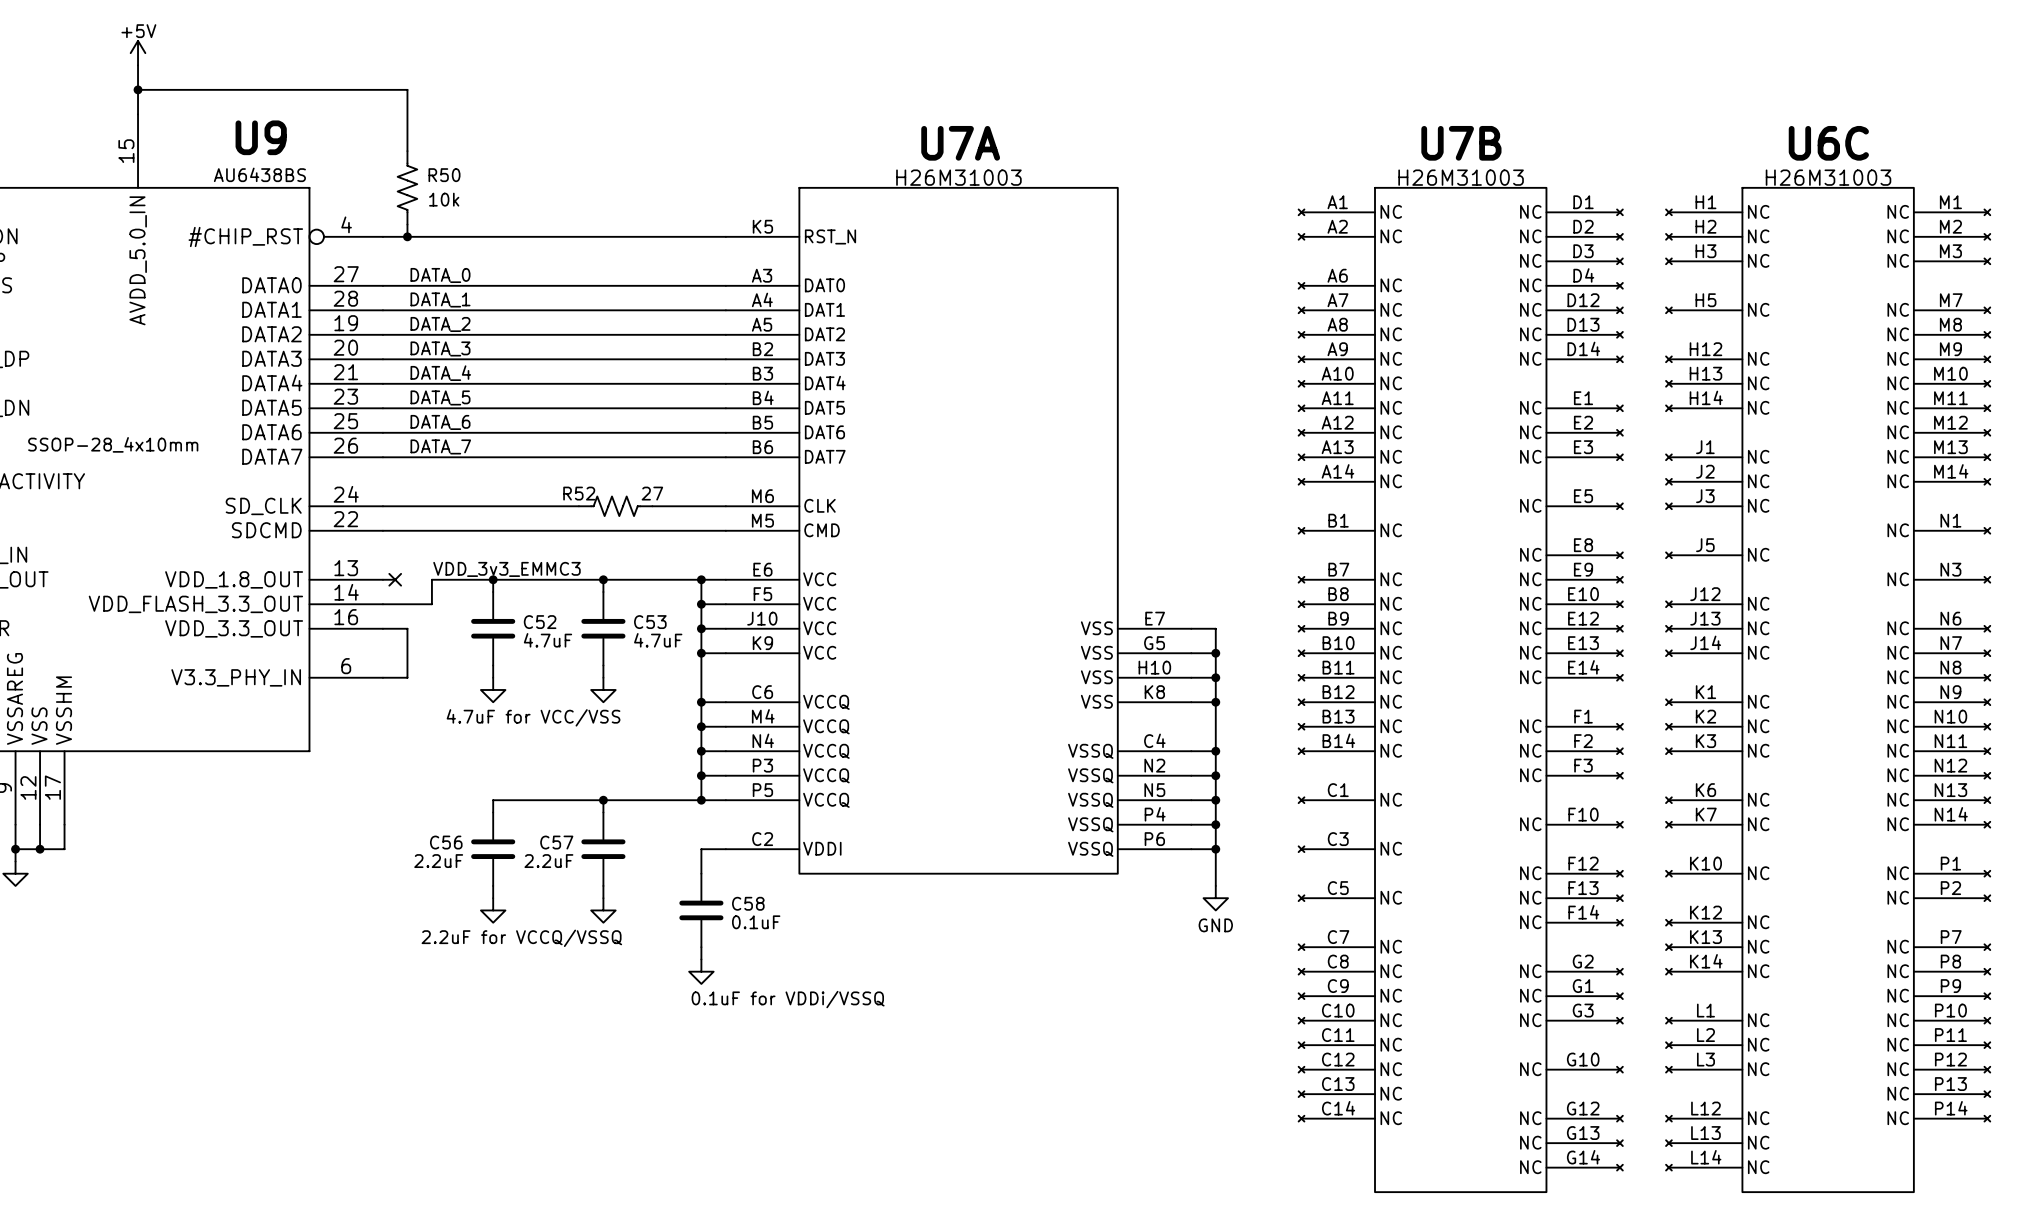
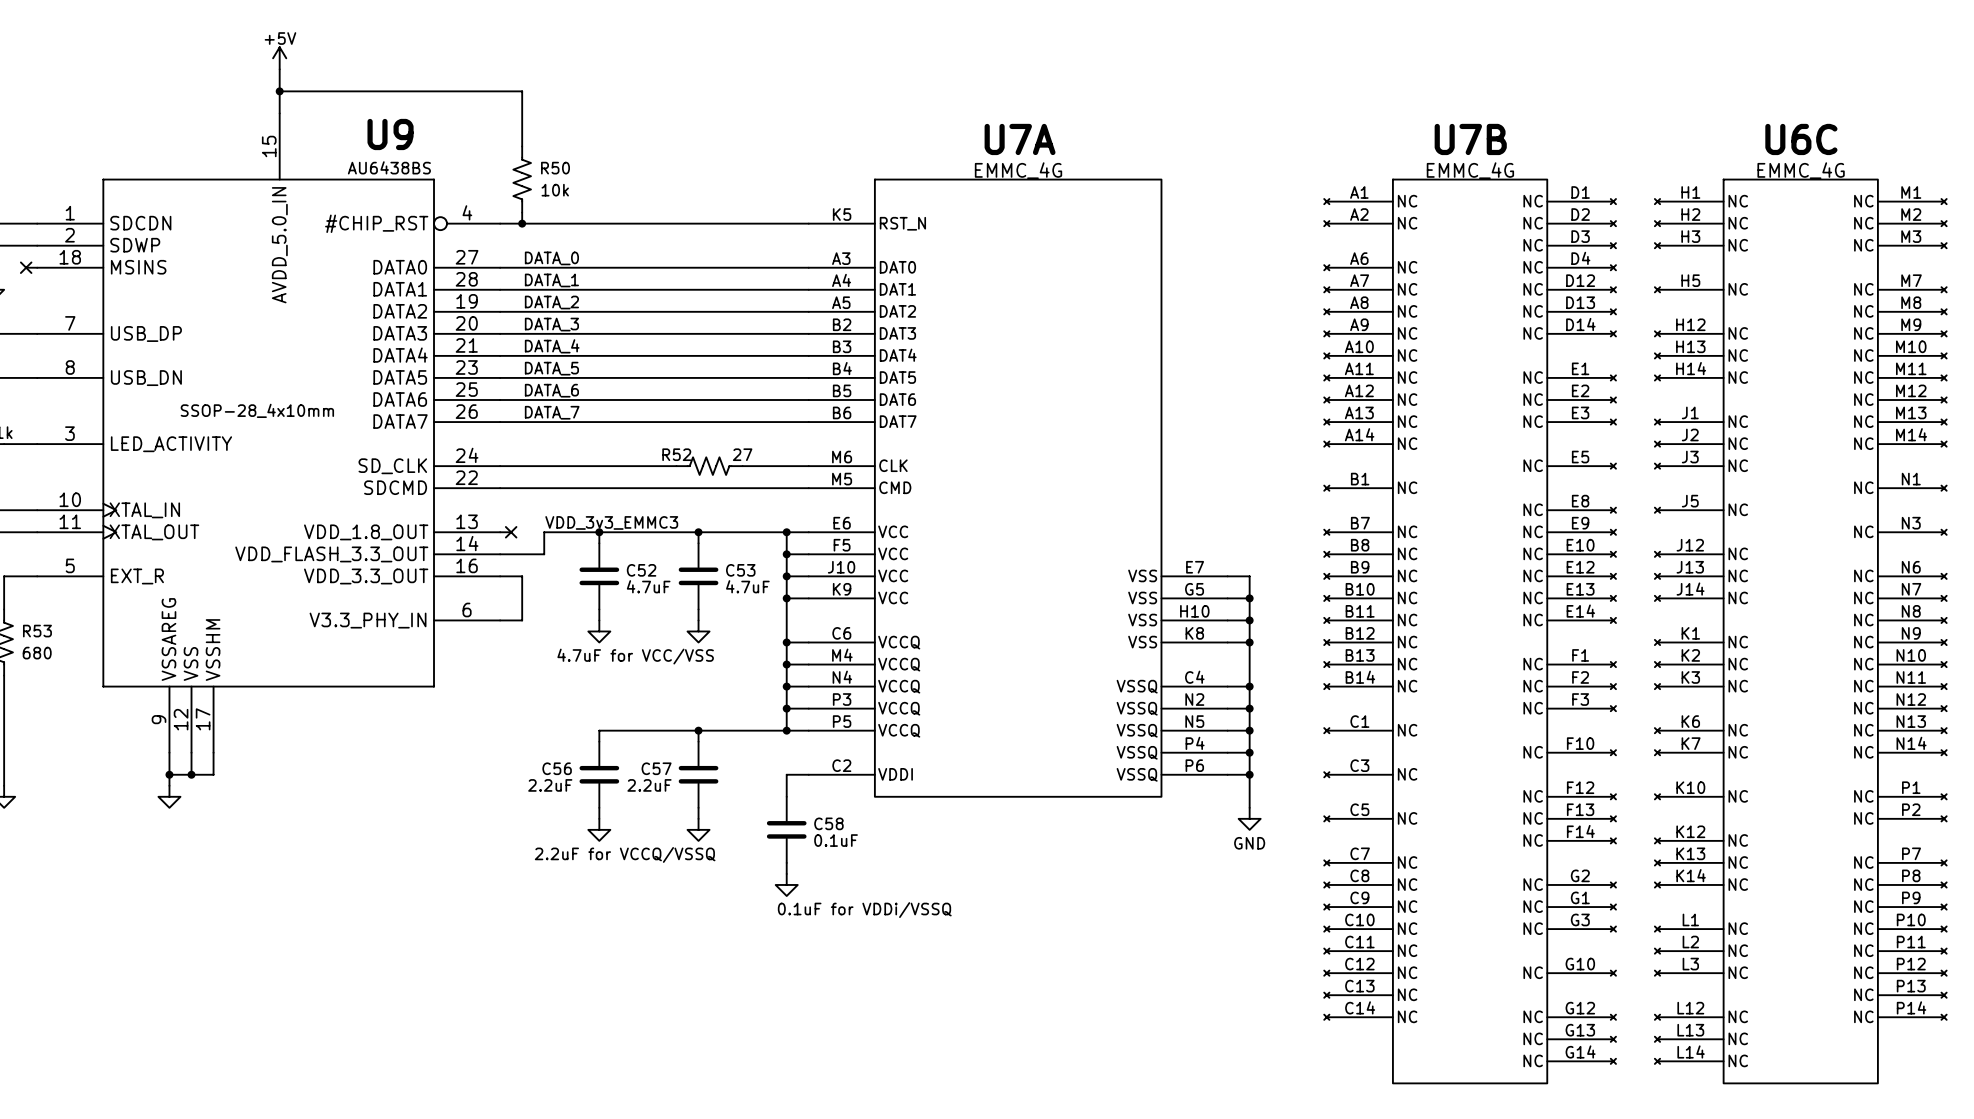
U7A value: H26M31003 (958, 177) -> EMMC_4G (1018, 170)
U7B value: H26M31003 (1461, 177) -> EMMC_4G (1470, 170)
U6C value: H26M31003 (1828, 177) -> EMMC_4G (1801, 170)

